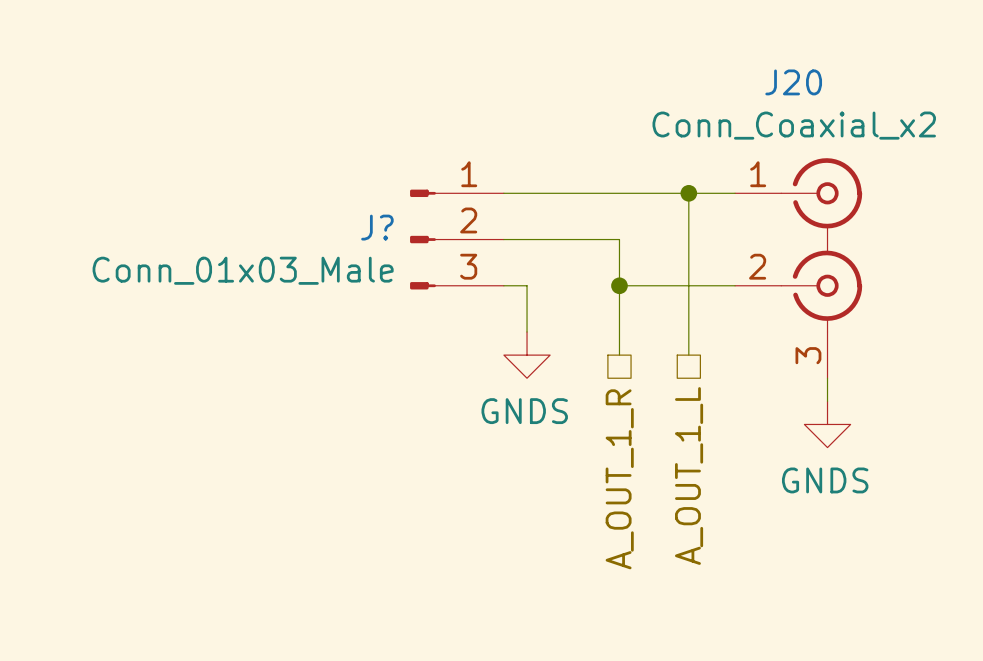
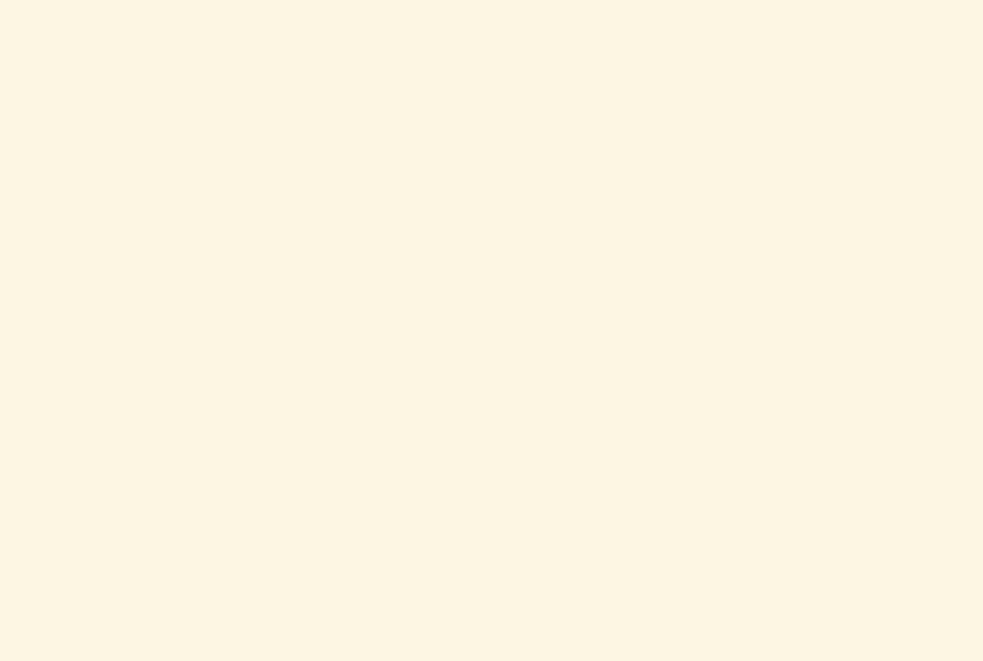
wire: (503, 193) (735, 193) -> none
wire: (688, 193) (688, 355) -> none
junction: (688, 193) -> none
J?: Conn_01x03_Male (456, 239) -> none
wire: (503, 239) (619, 239) (619, 355) -> none
J20: Conn_Coaxial_x2 (798, 268) -> none
wire: (503, 285) (527, 285) (527, 332) -> none
wire: (619, 285) (735, 285) -> none
junction: (619, 285) -> none
power symbol: GNDS (527, 355) -> none
wire: (827, 378) (827, 401) -> none
power symbol: GNDS (827, 424) -> none
hierarchical label: A_OUT_1_L (689, 476) -> none
hierarchical label: A_OUT_1_R (619, 479) -> none

